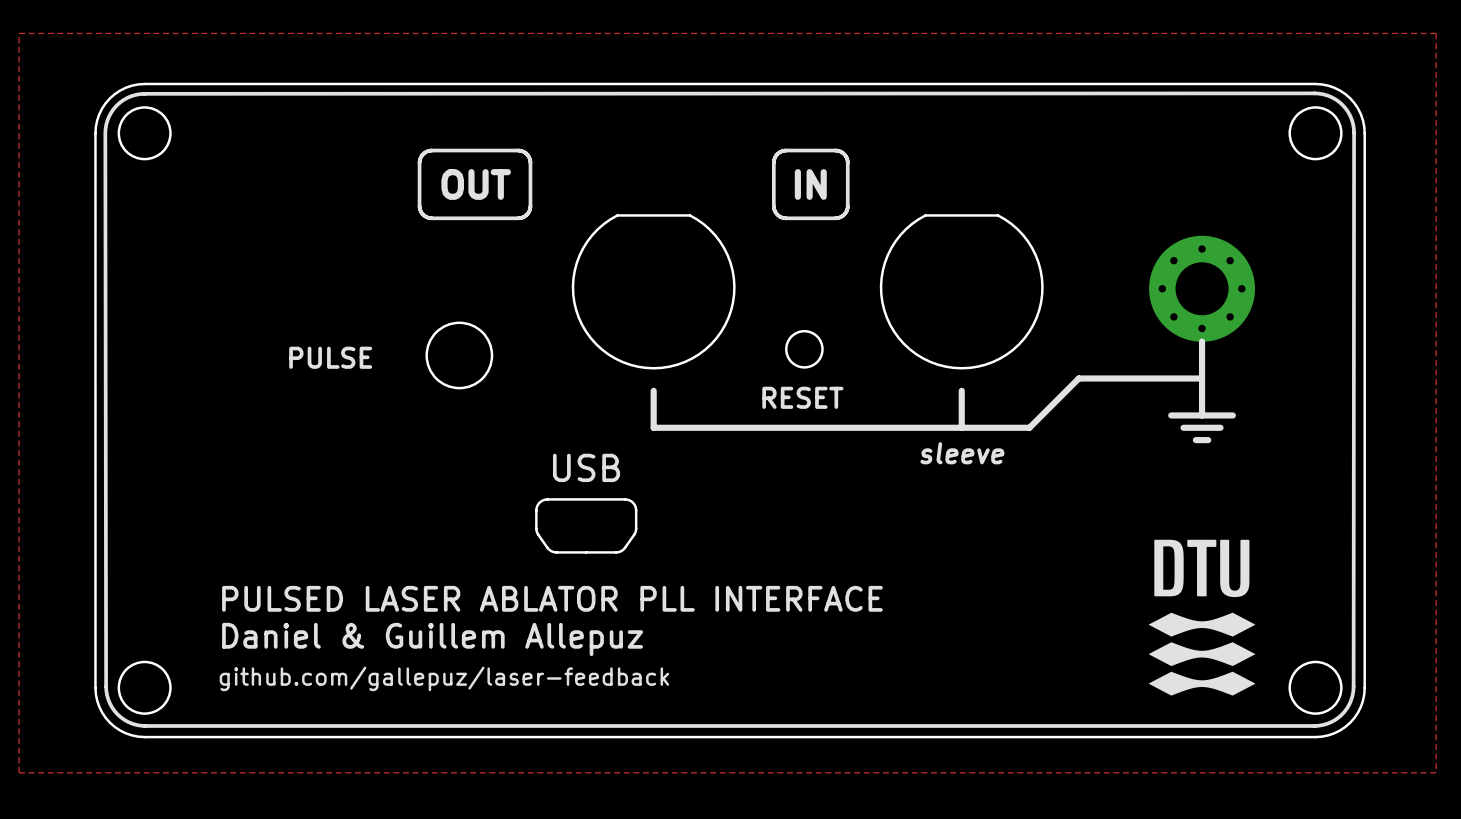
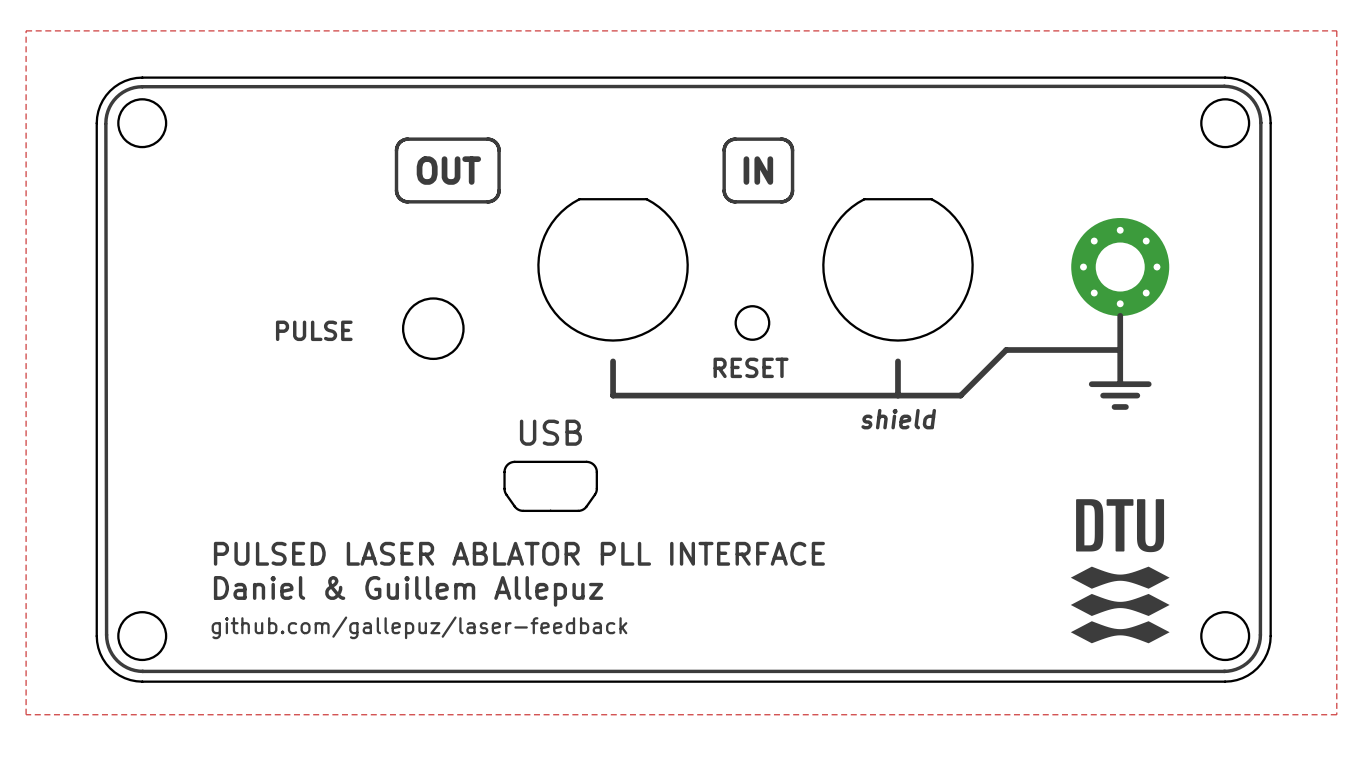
text: sleeve (962, 453) -> shield (898, 419)

